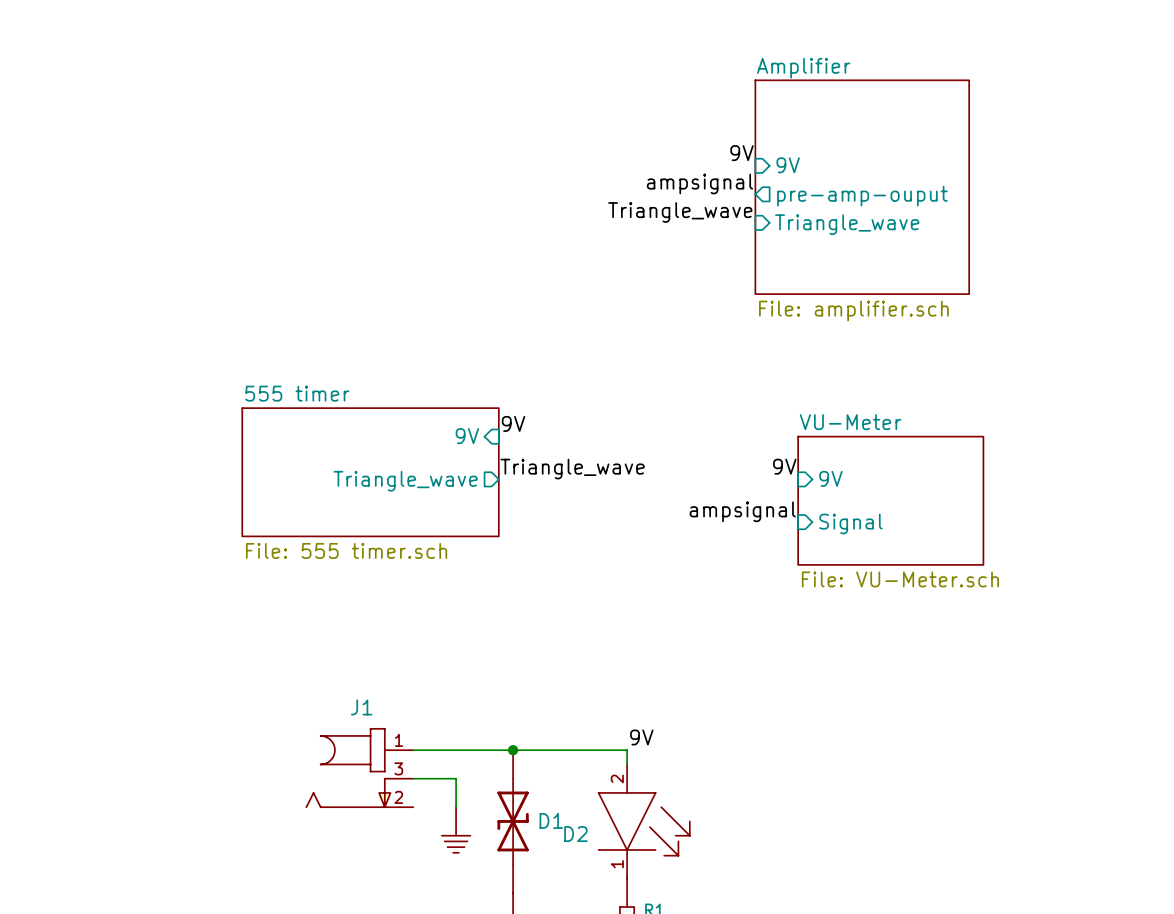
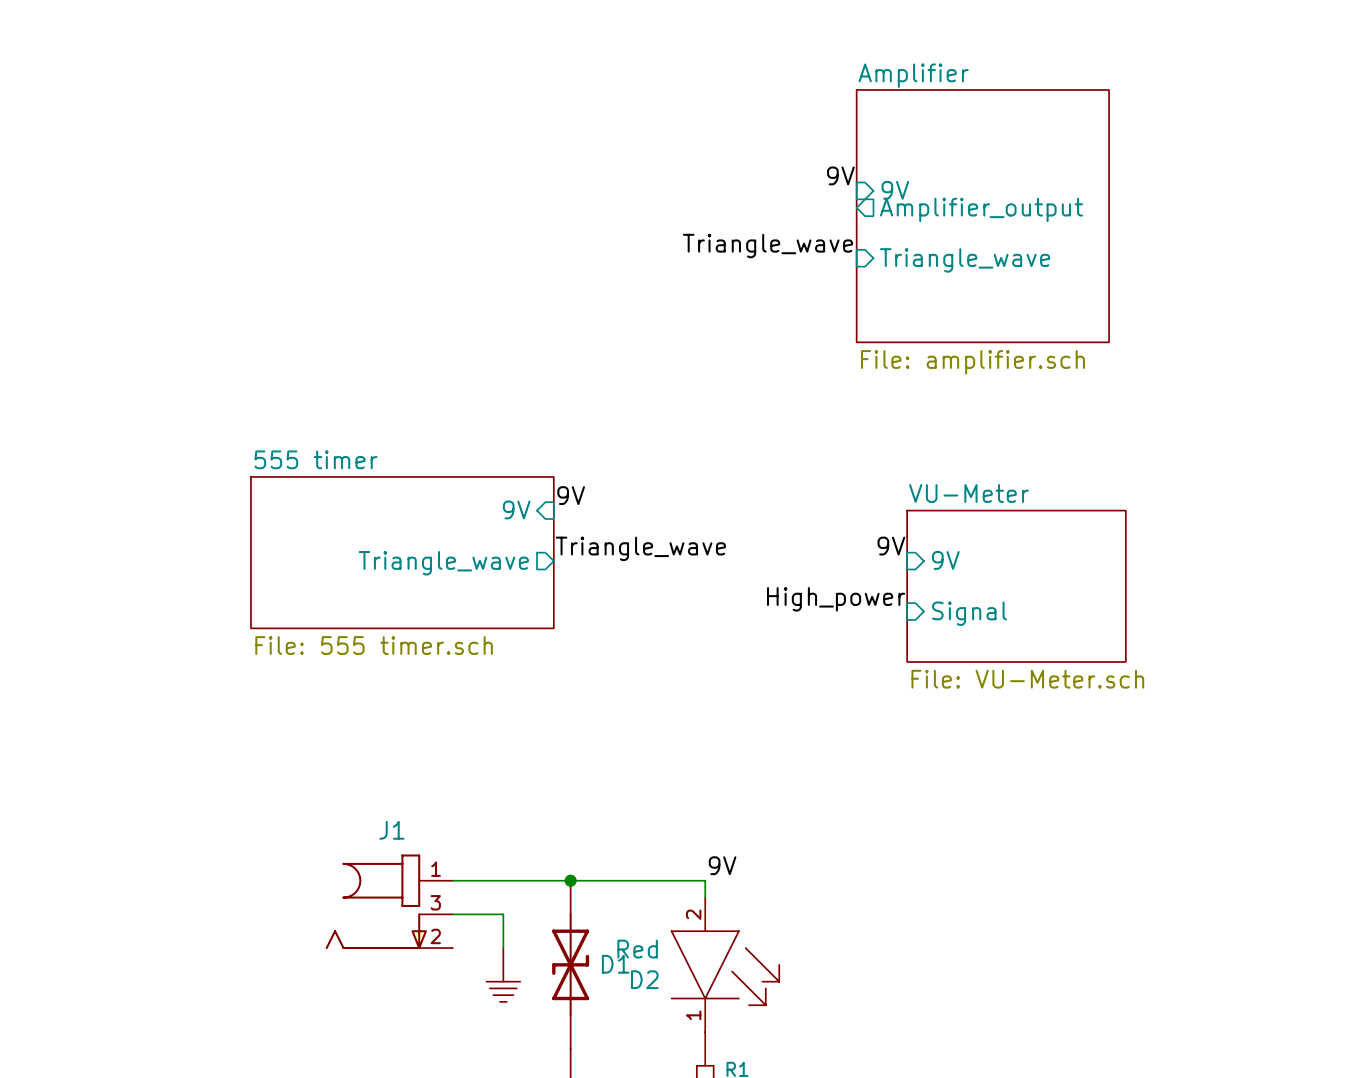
sheet pin: none -> Amplifier_output (981, 209)
label: ampsignal (699, 183) -> none
sheet pin: pre-amp-ouput (862, 196) -> none
label: ampsignal (742, 511) -> High_power (836, 599)
D2 text: none -> Red (637, 949)

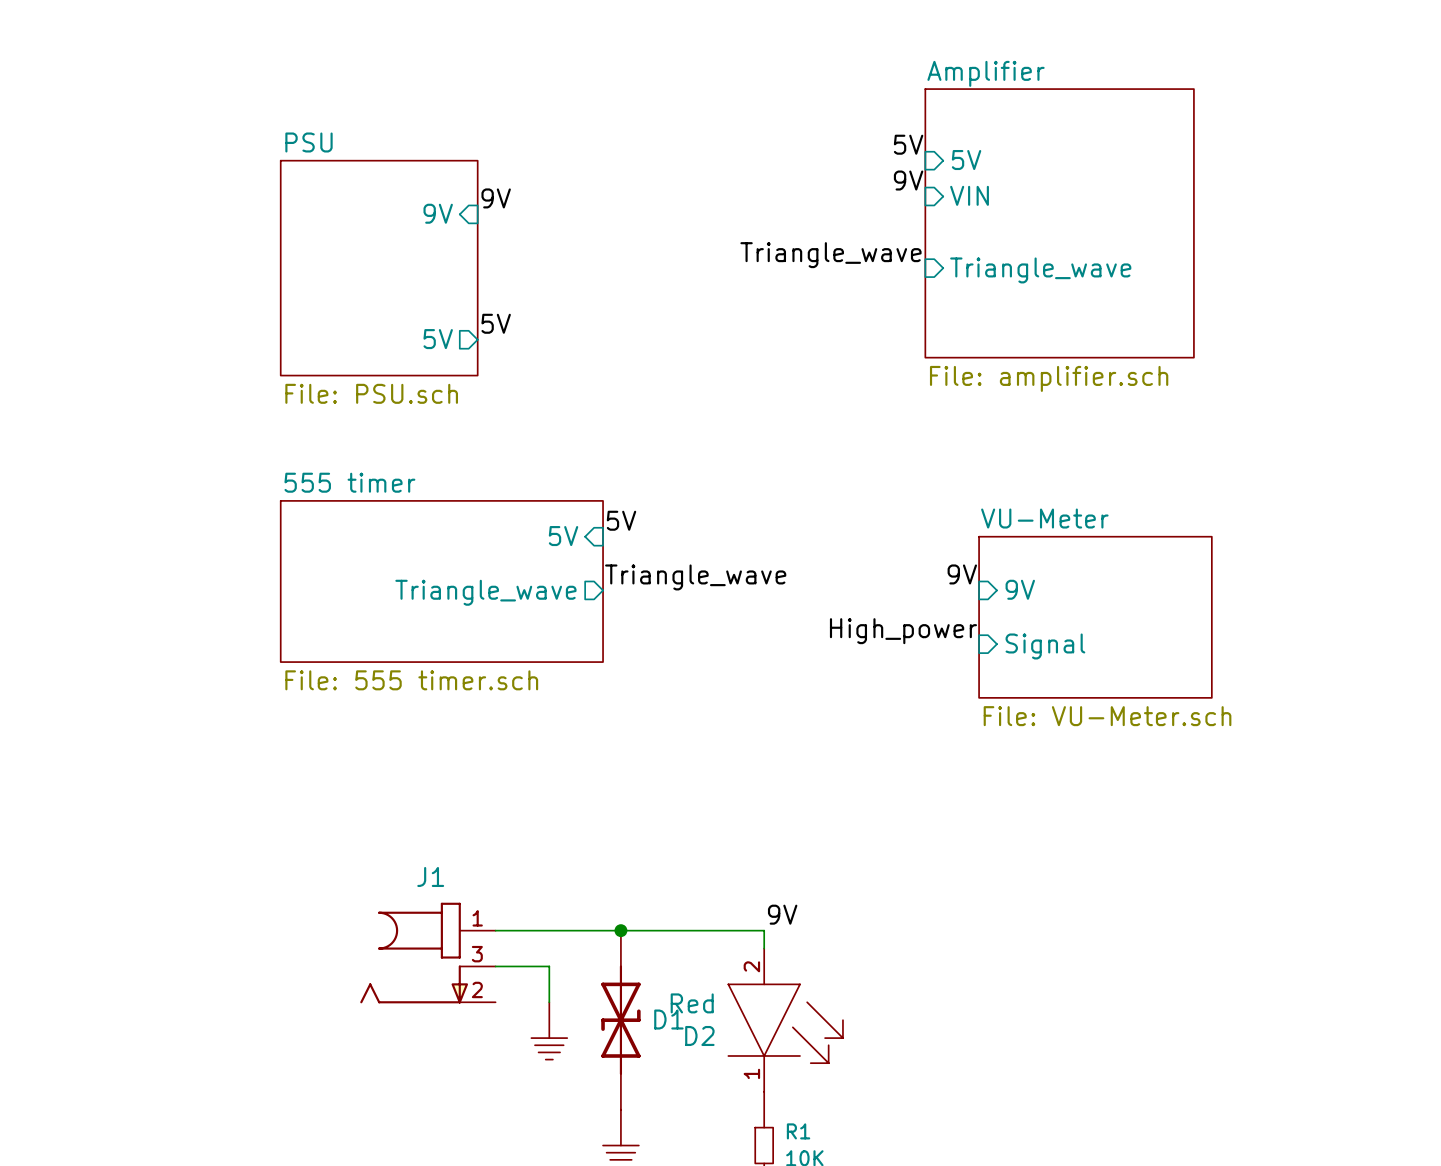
label: none -> 5V (908, 144)
sheet pin: none -> 5V (966, 160)
sheet pin: 9V (895, 190) -> VIN (969, 195)
label: none -> 9V (496, 198)
sheet pin: none -> 9V (438, 213)
sheet pin: Amplifier_output (981, 209) -> none
sheet PSU: none -> File: PSU.sch (379, 268)
label: none -> 5V (496, 323)
sheet pin: none -> 5V (438, 339)
label: 9V (571, 495) -> 5V (621, 520)
sheet pin: 9V (516, 509) -> 5V (563, 536)

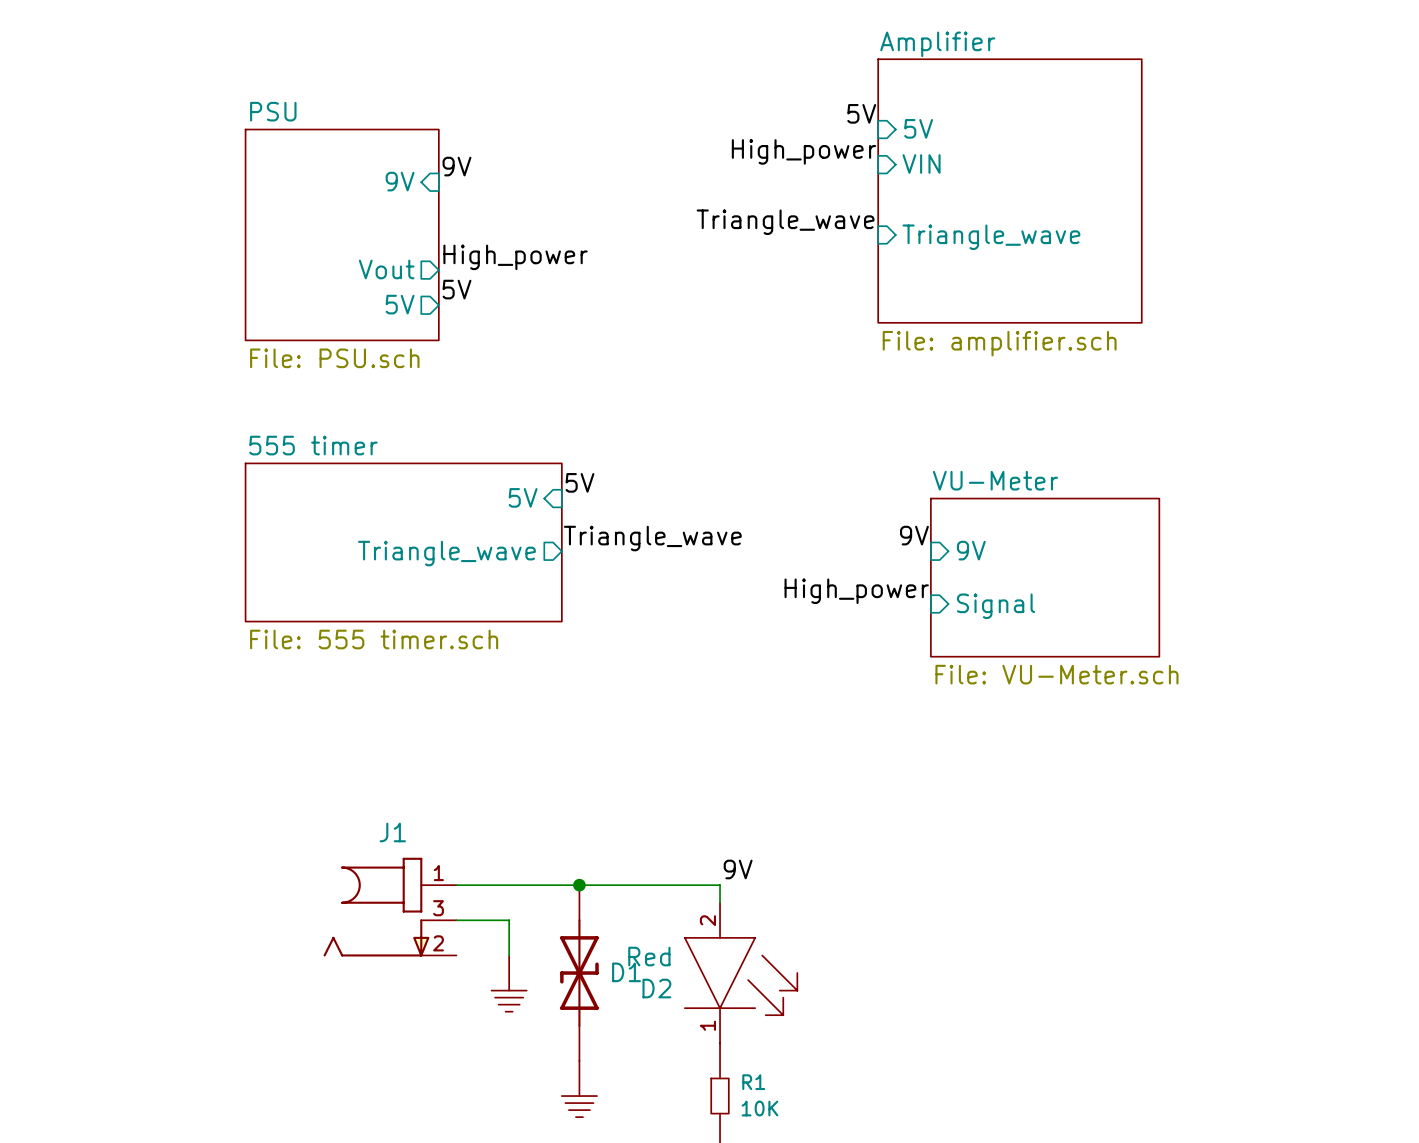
label: 9V (908, 180) -> High_power (803, 151)
label: none -> High_power (515, 257)
sheet pin: none -> Vout (386, 269)

